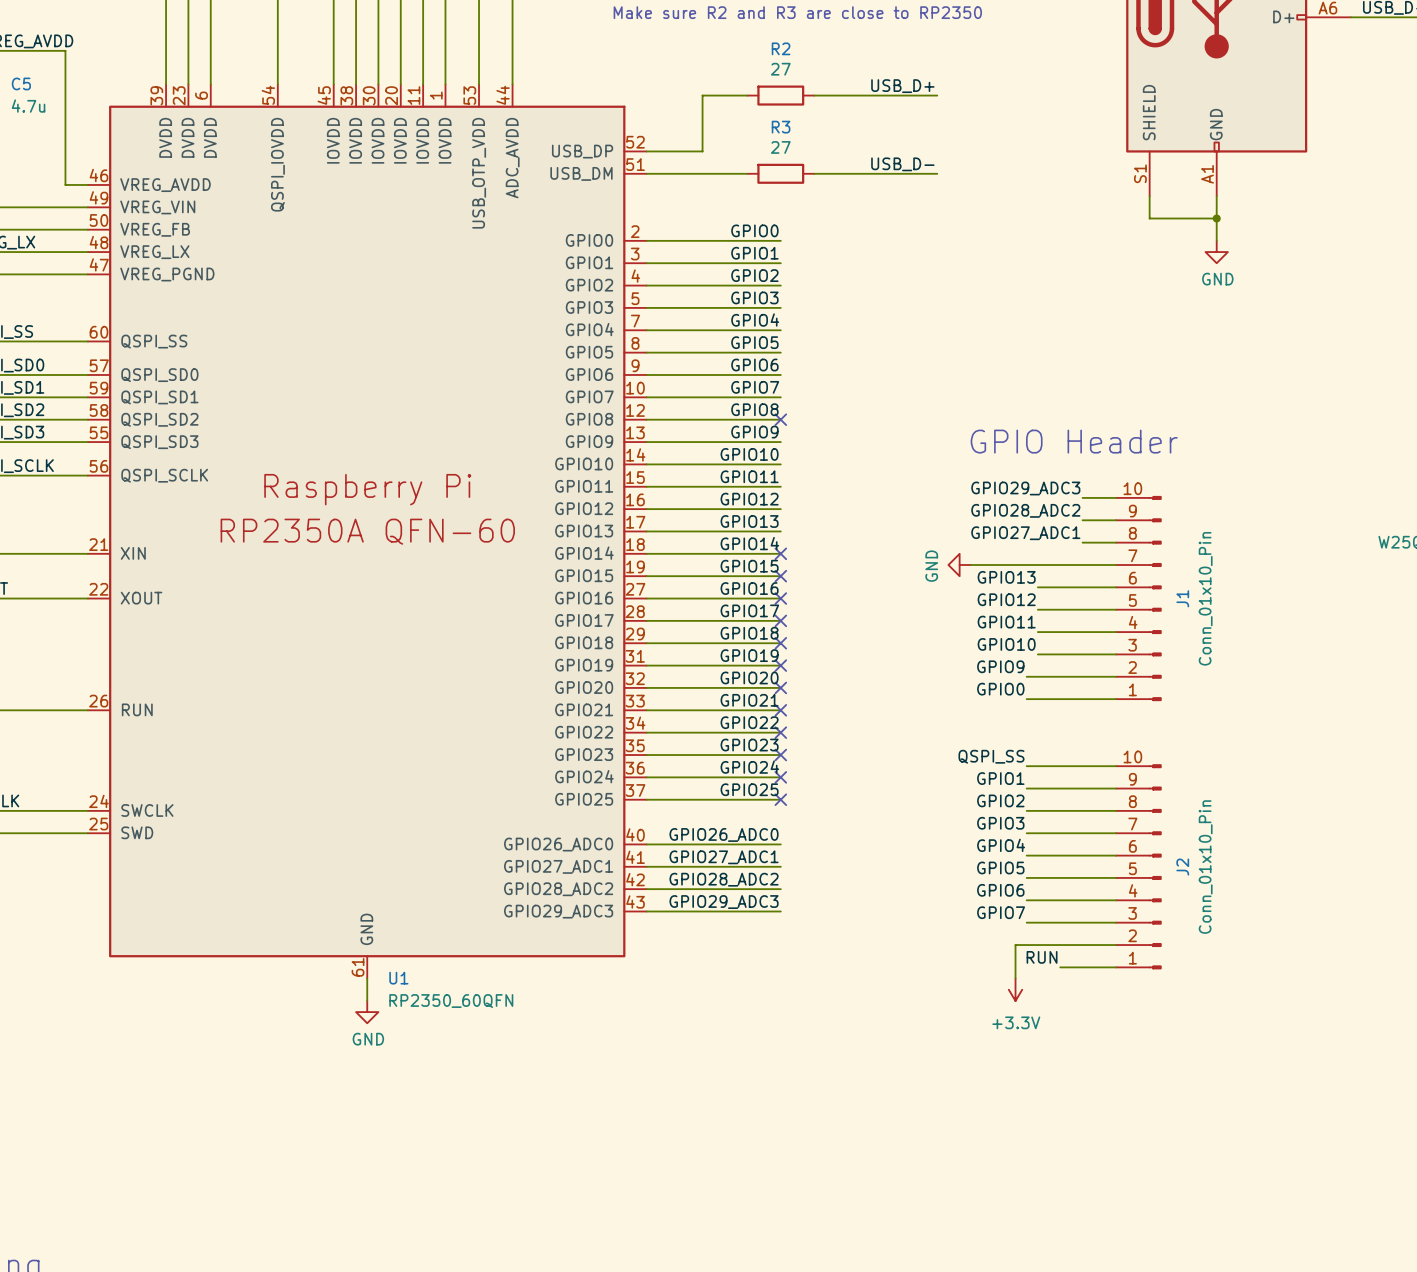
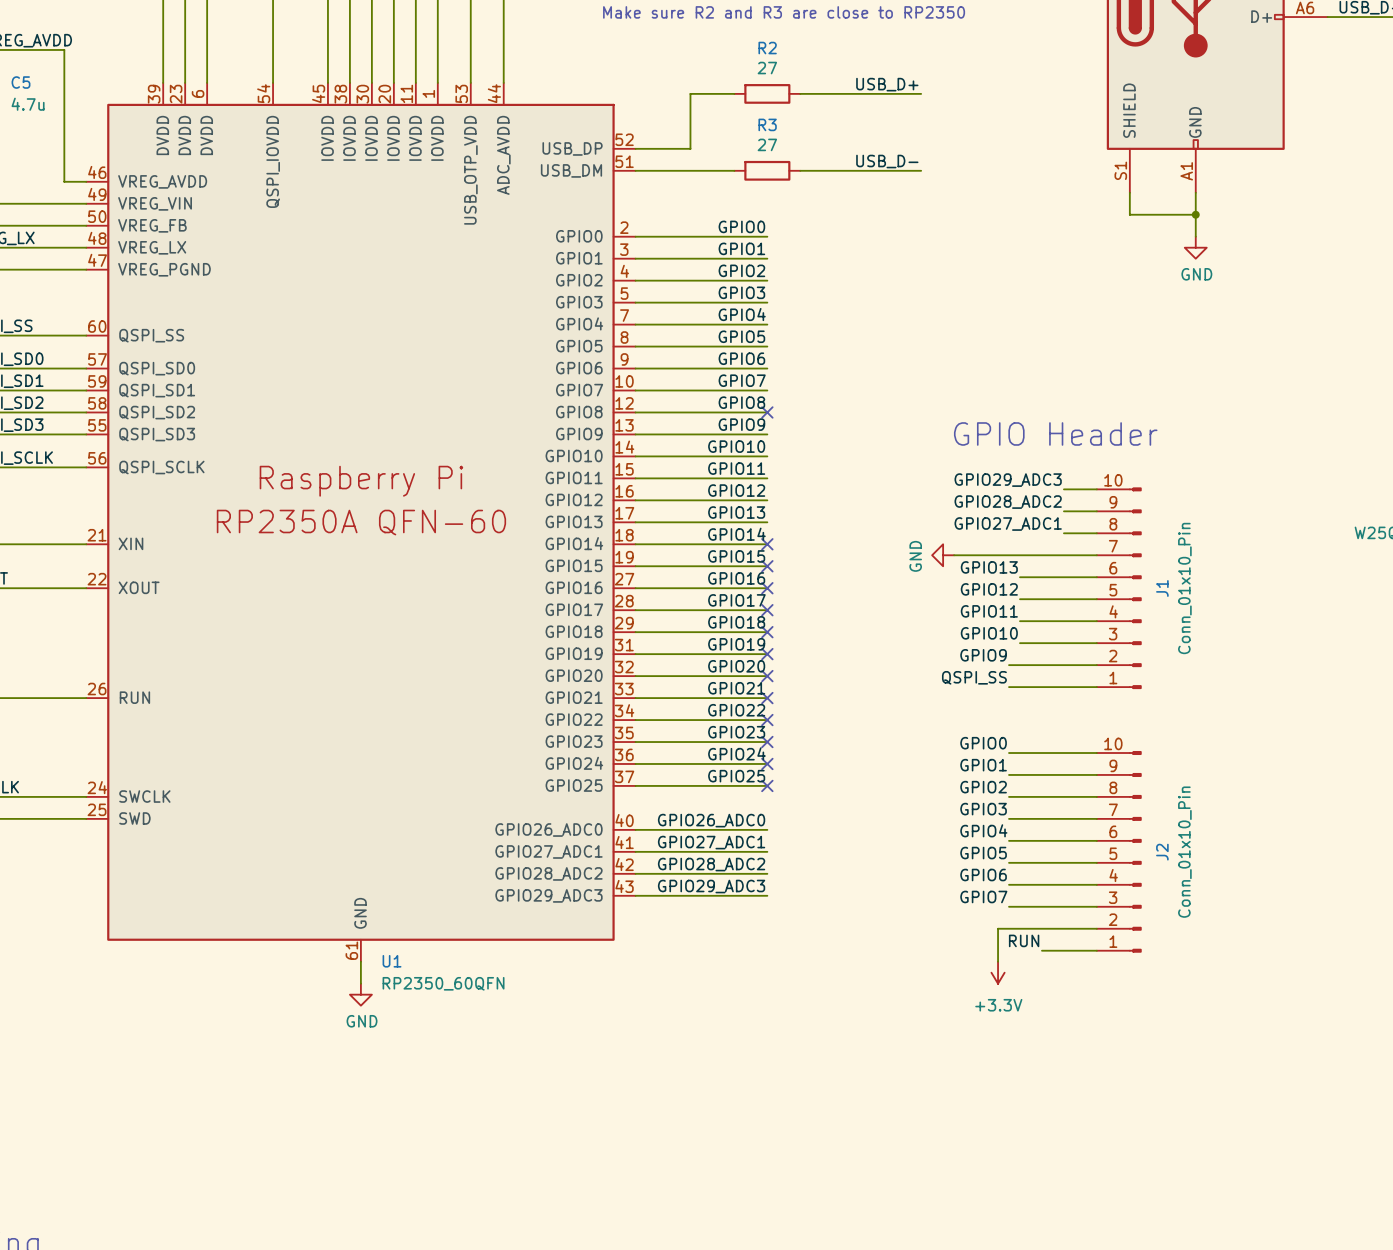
label: GPIO0 (1000, 689) -> QSPI_SS (974, 677)
label: QSPI_SS (991, 756) -> GPIO0 (983, 743)

